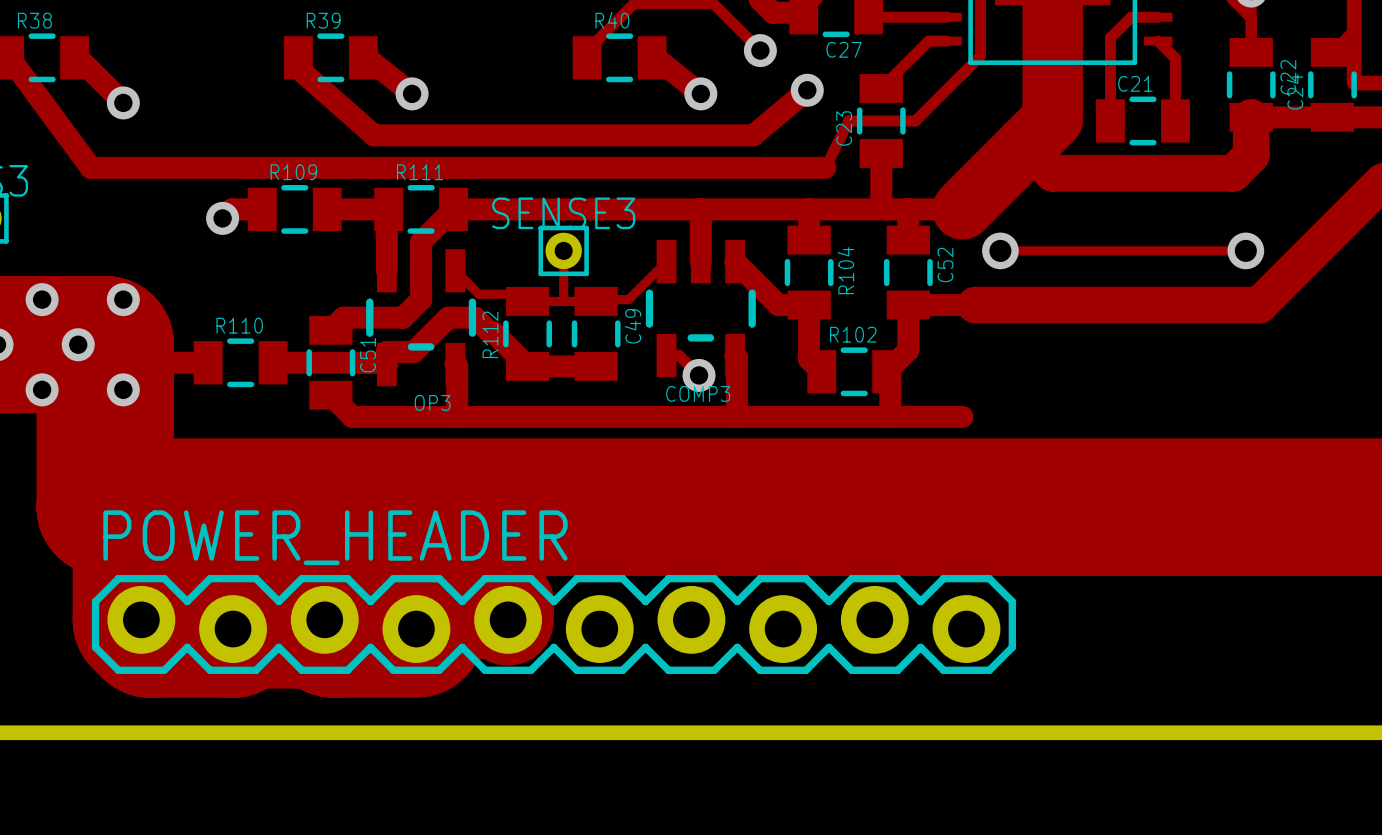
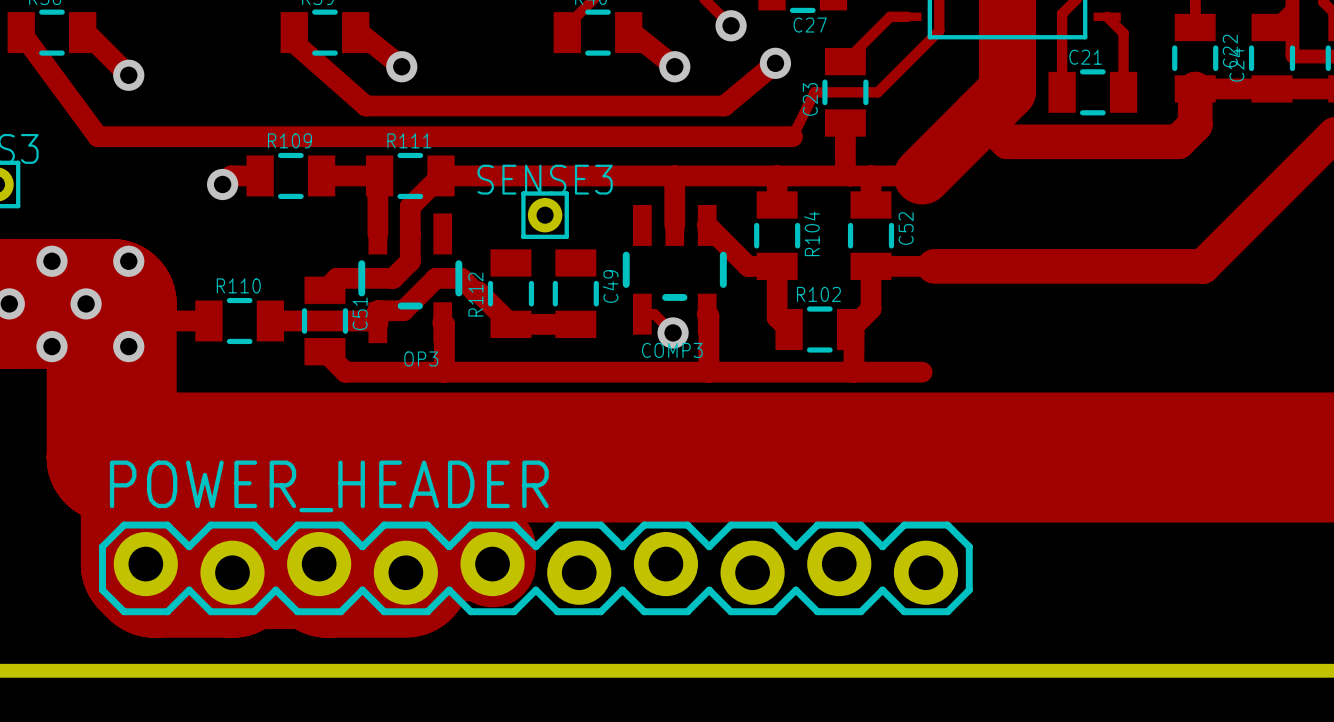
track: (563, 250) (563, 301) -> none
track: (1000, 250) (1245, 250) -> none
via: (1000, 250) -> none
via: (1245, 250) -> none
track: (666, 261) (628, 299) (599, 299) (596, 301) (527, 301) (518, 294) (478, 294) (455, 270) -> none

